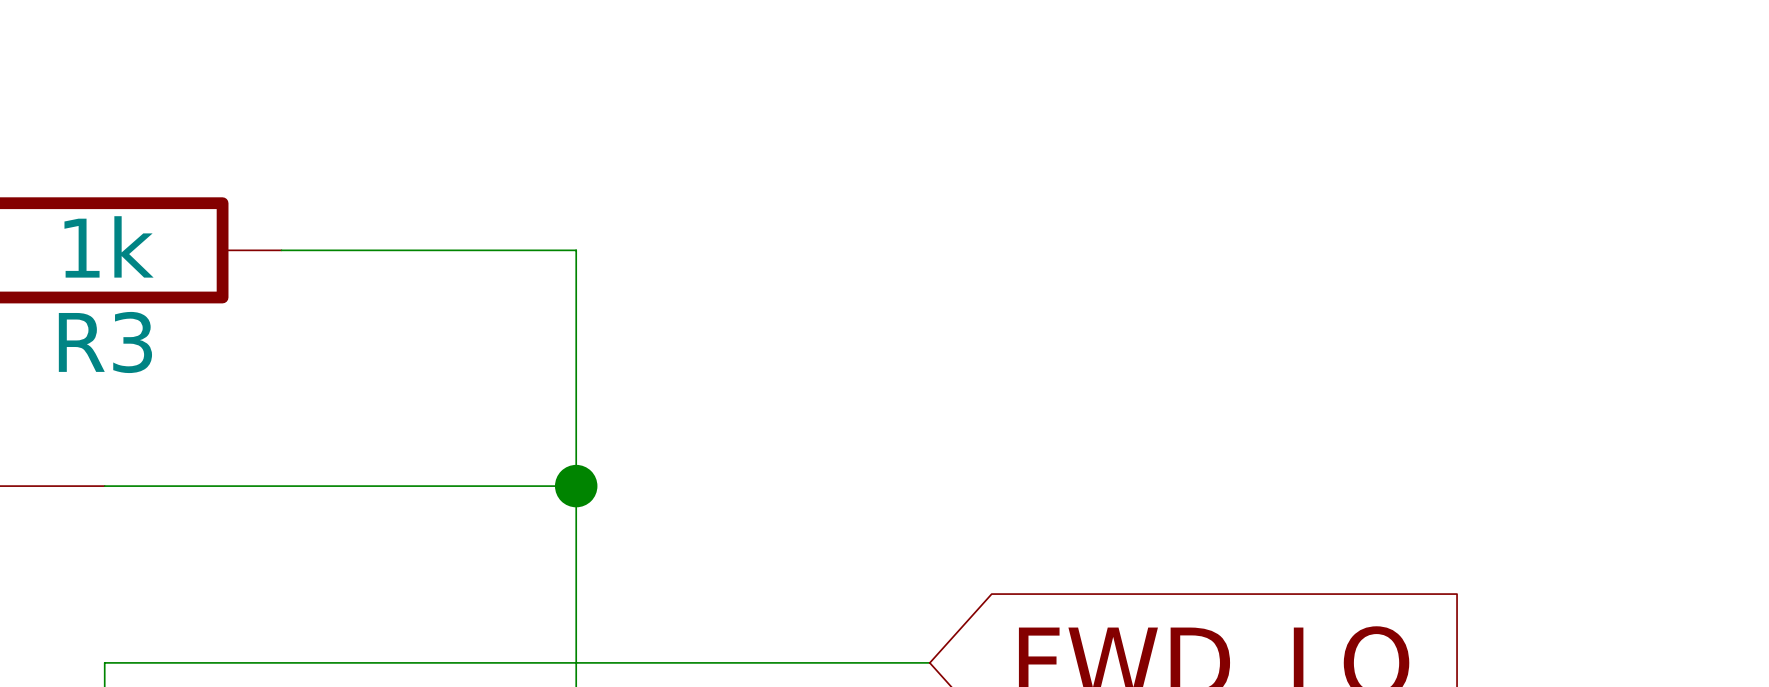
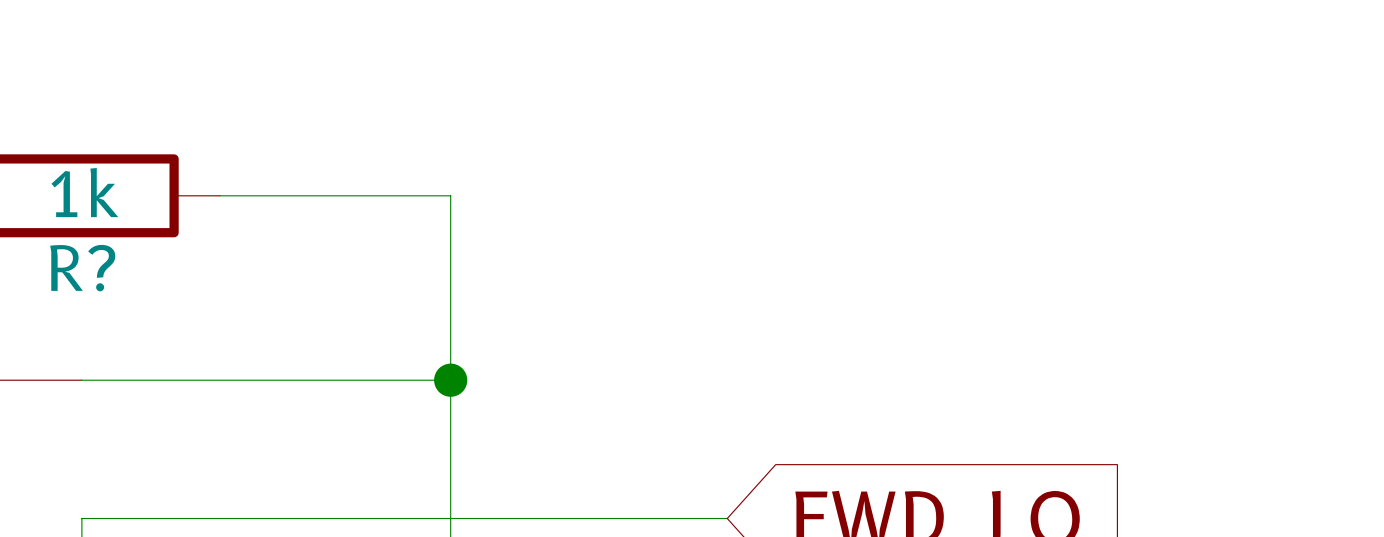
R3 name: R3 (105, 342) -> R? (82, 268)

